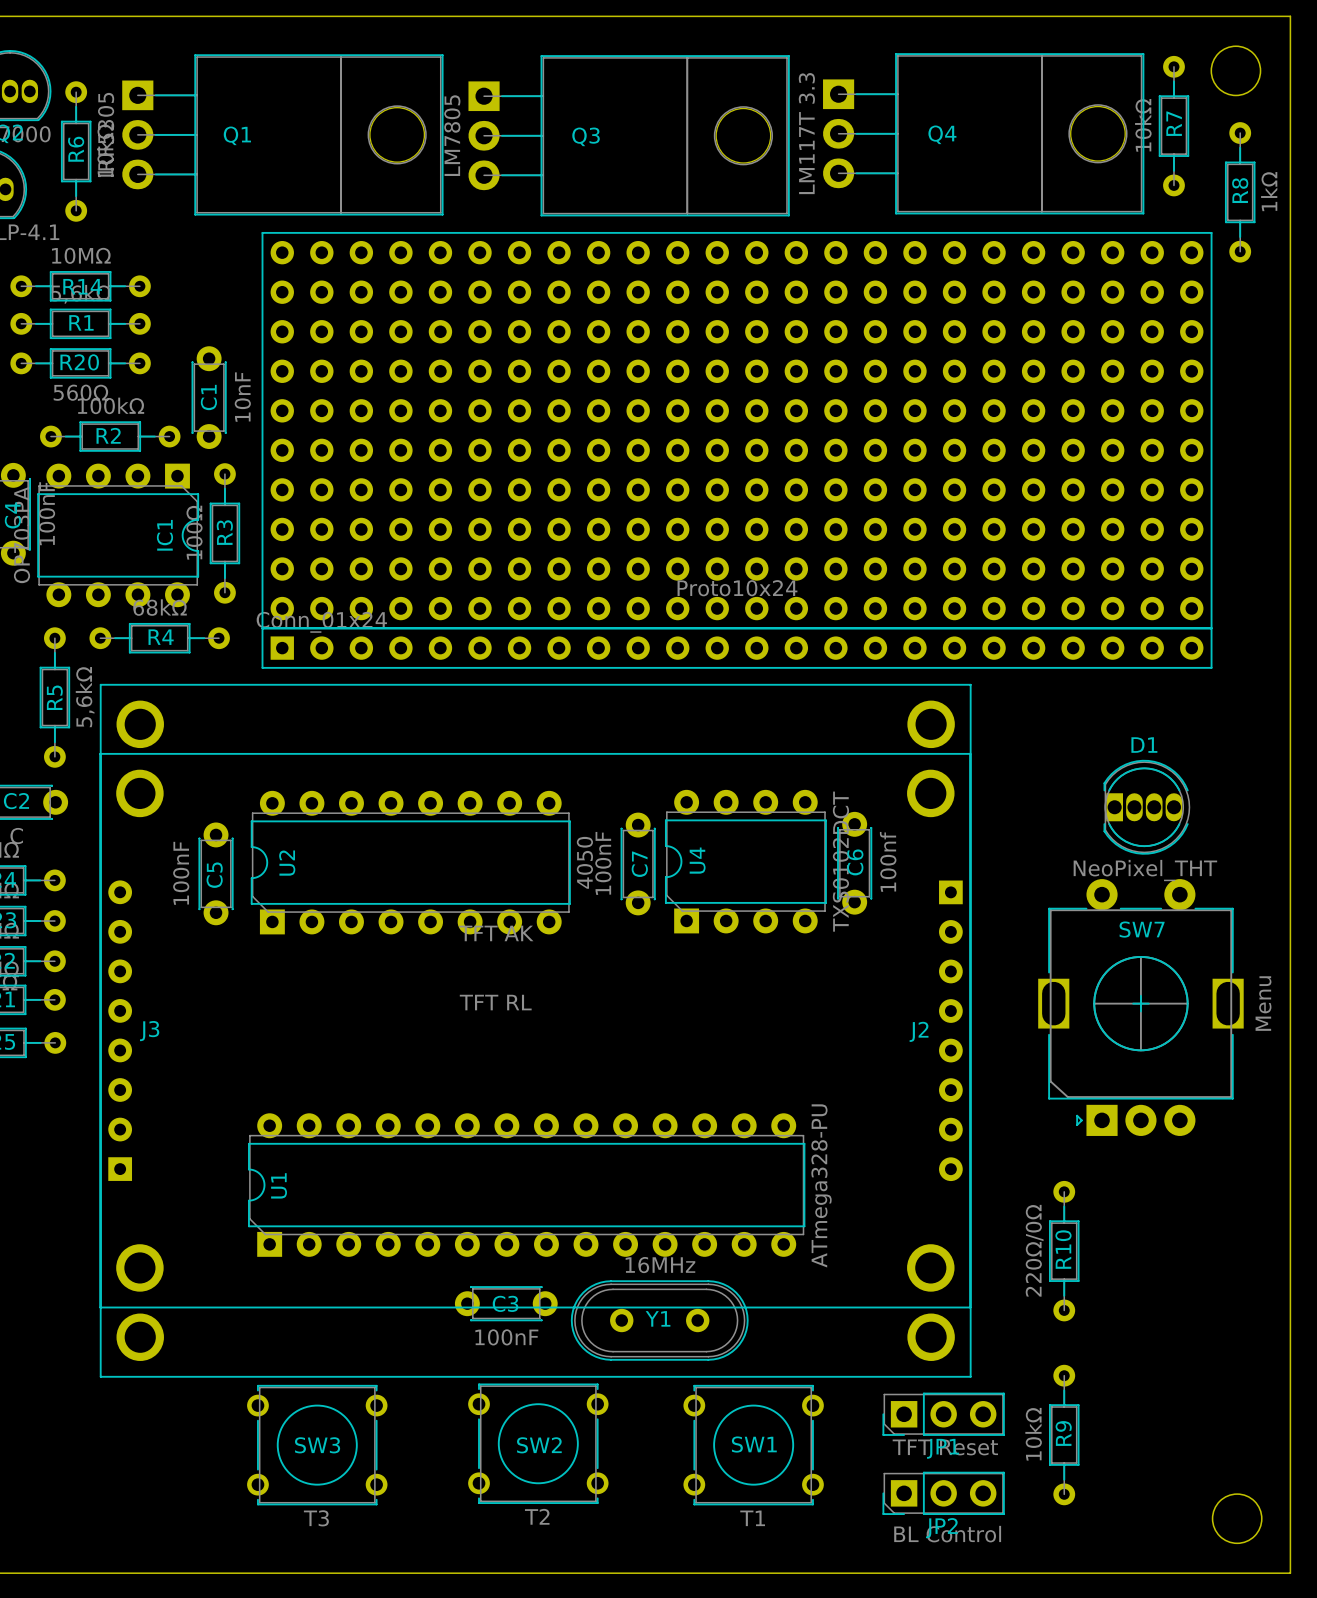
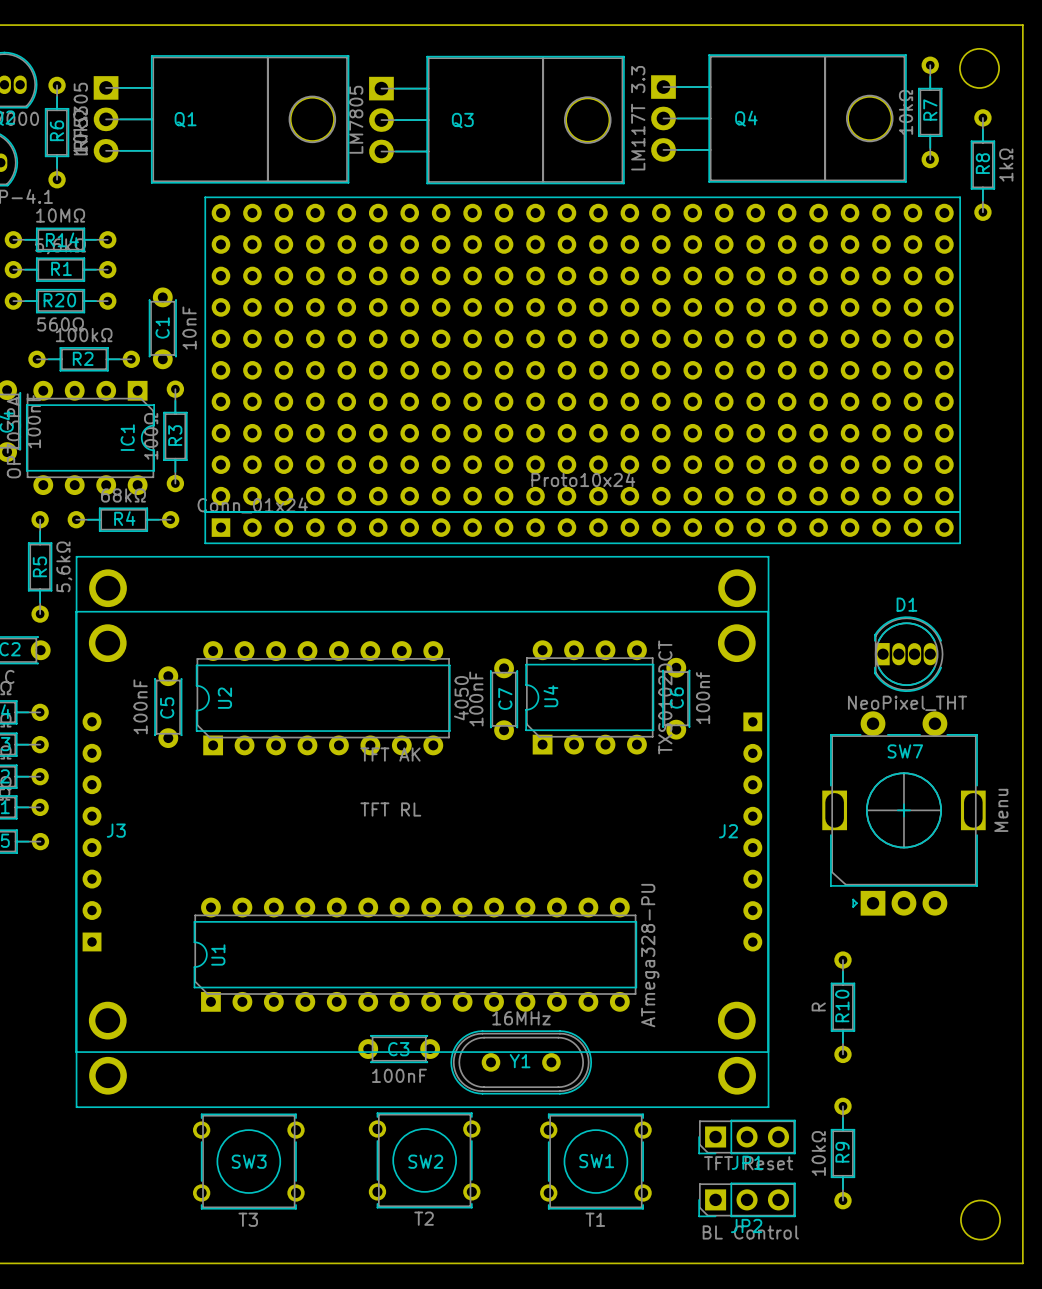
R10 value: 220Ω/0Ω (1034, 1250) -> R (818, 1006)

